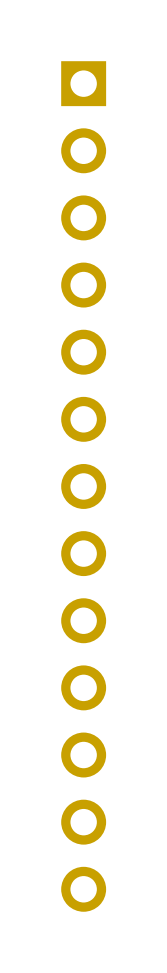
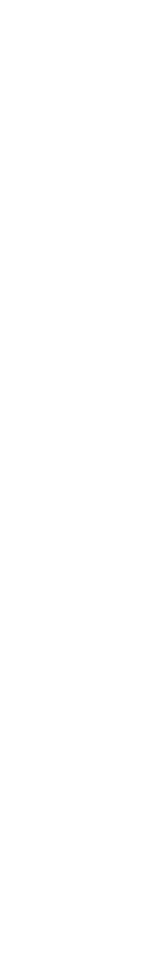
part: (83, 486) -> none

